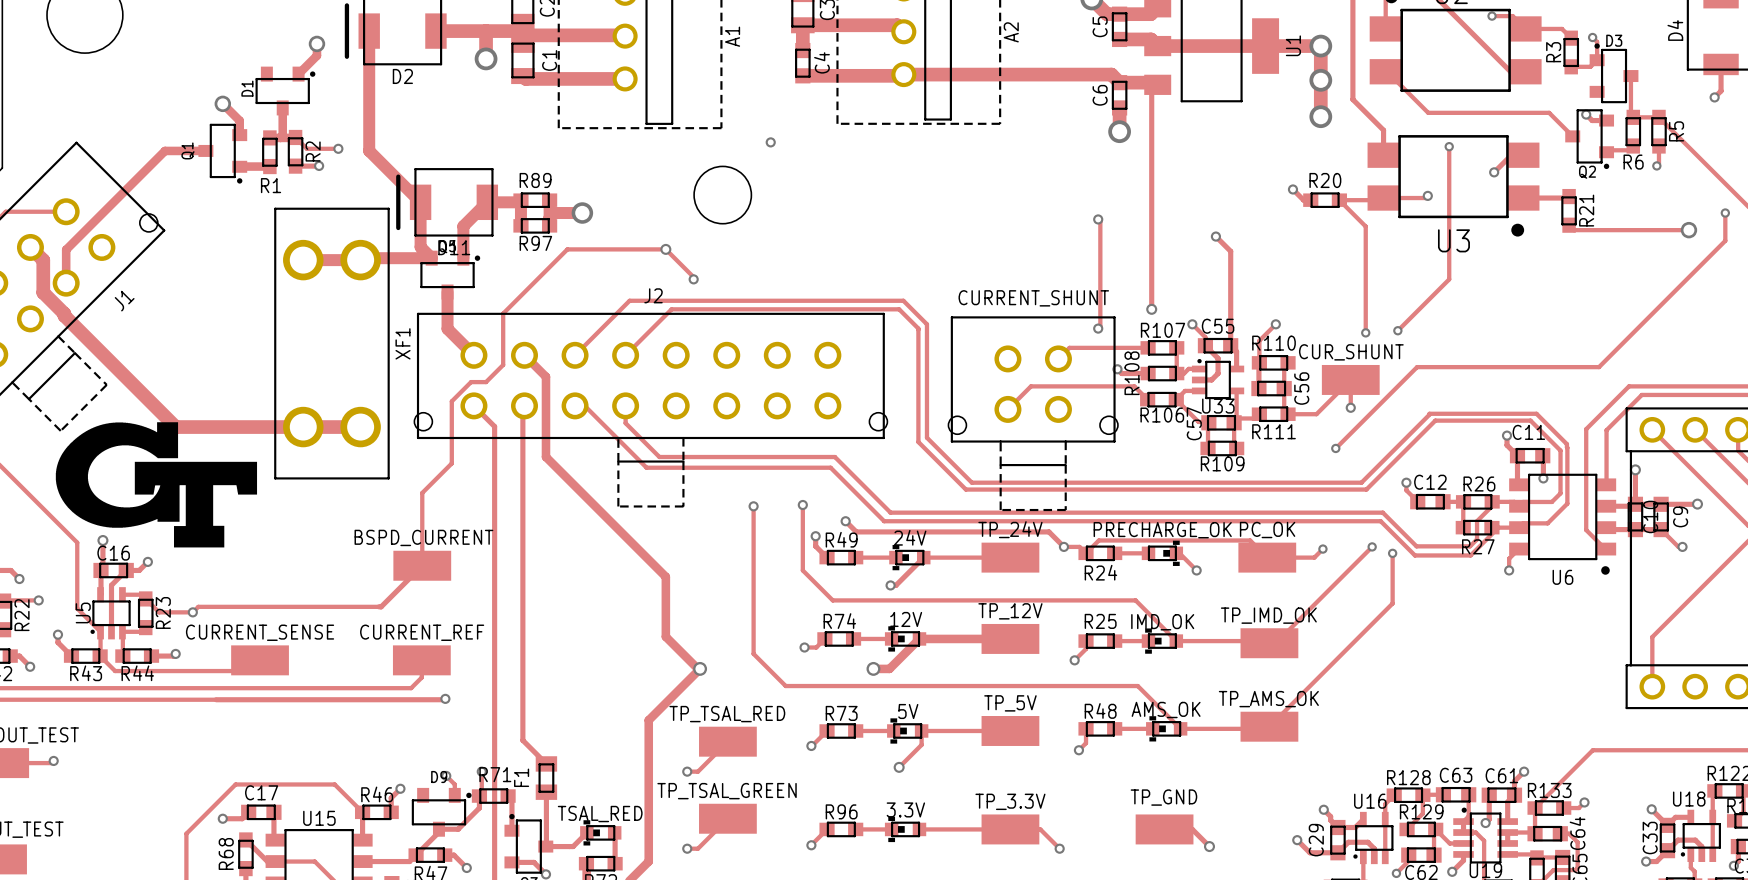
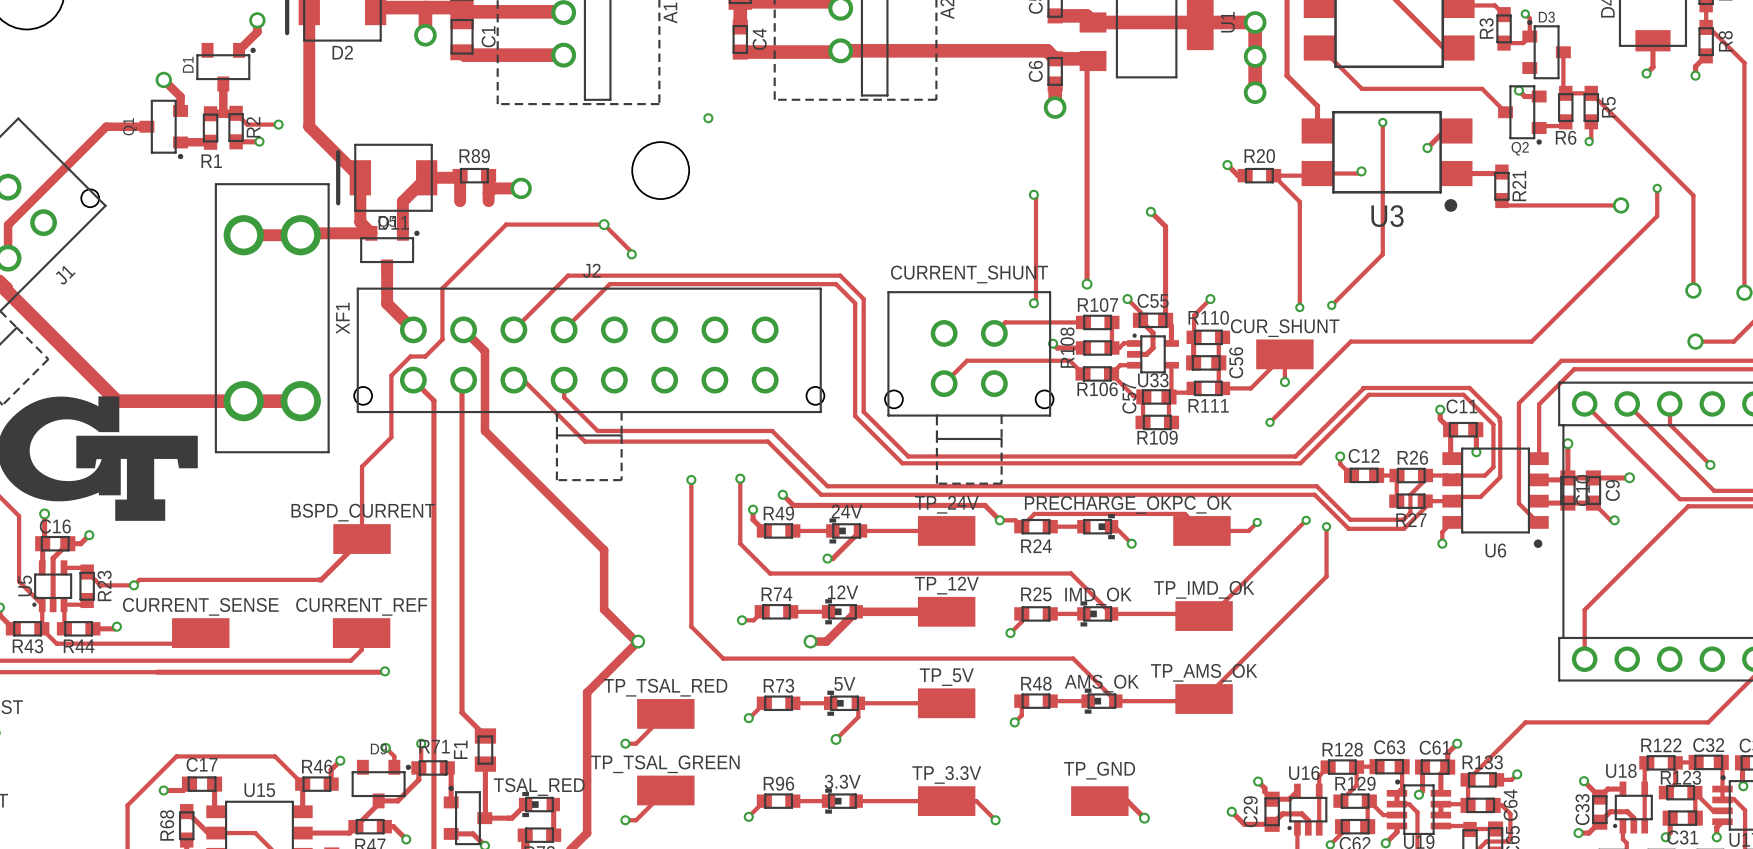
R97: (535, 225) -> none

